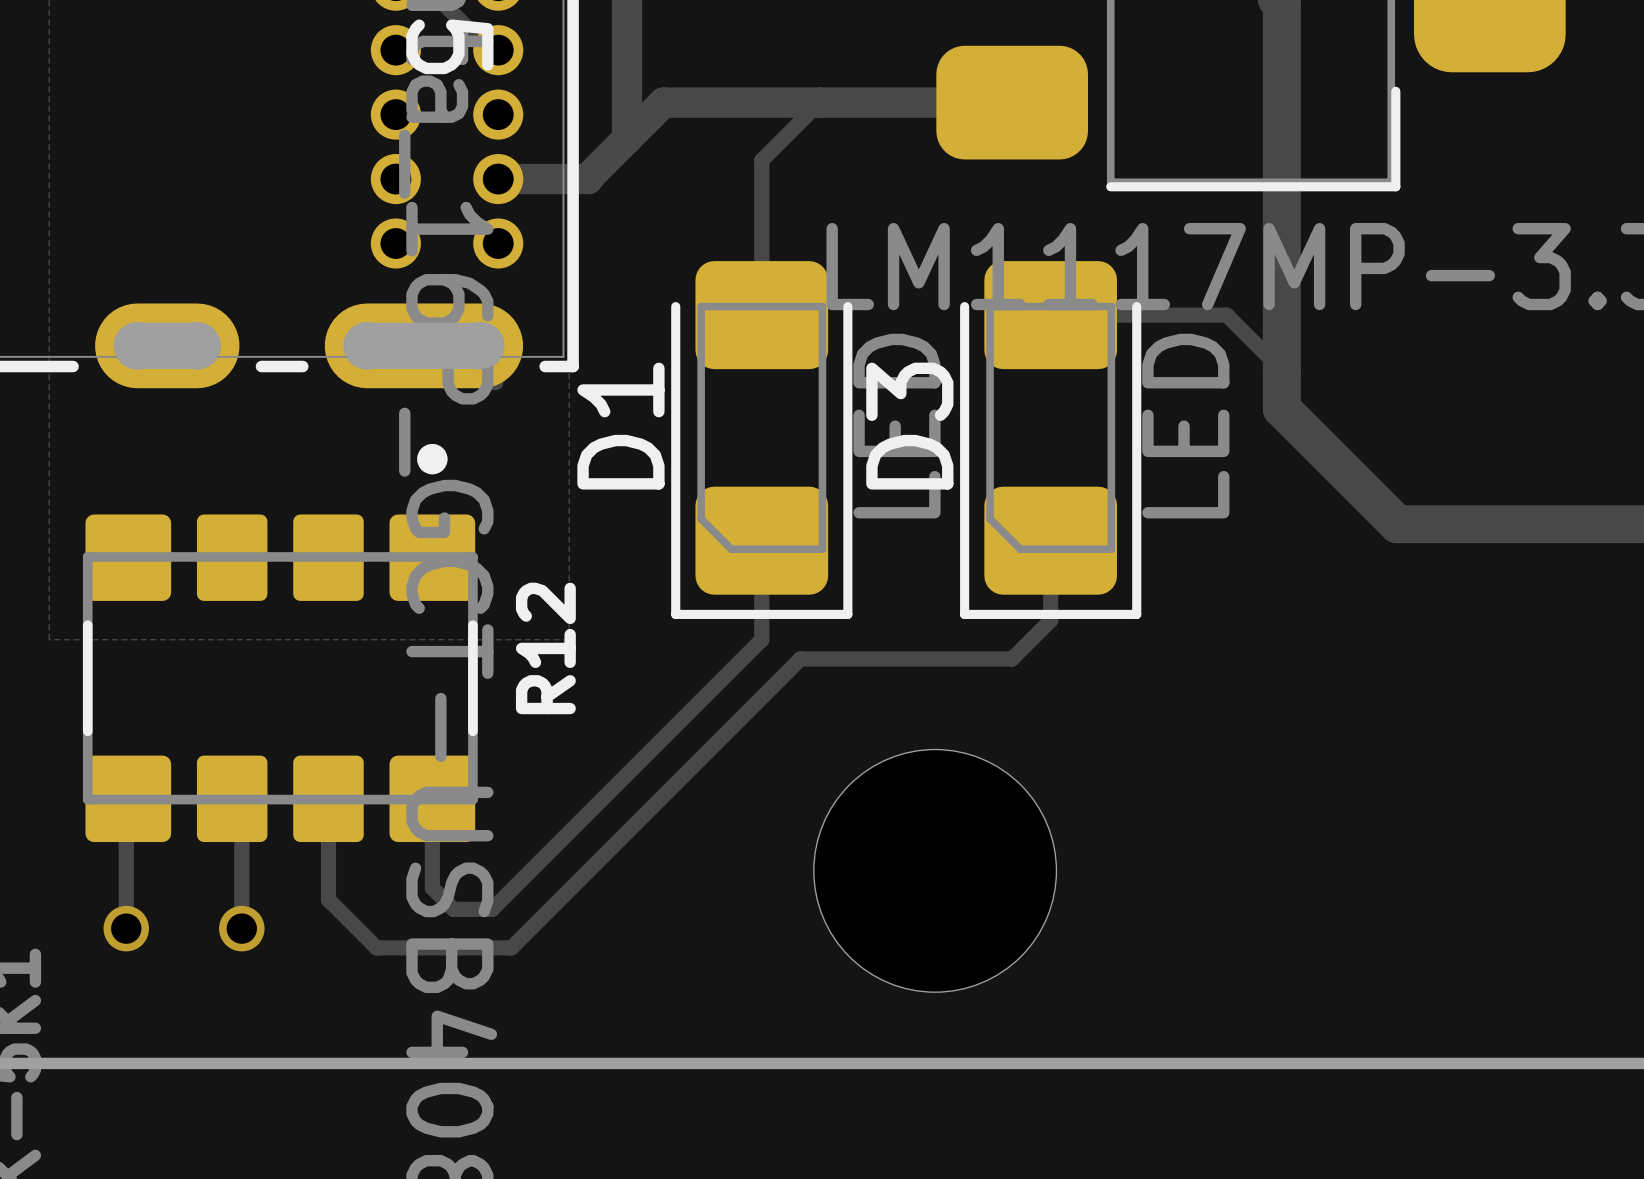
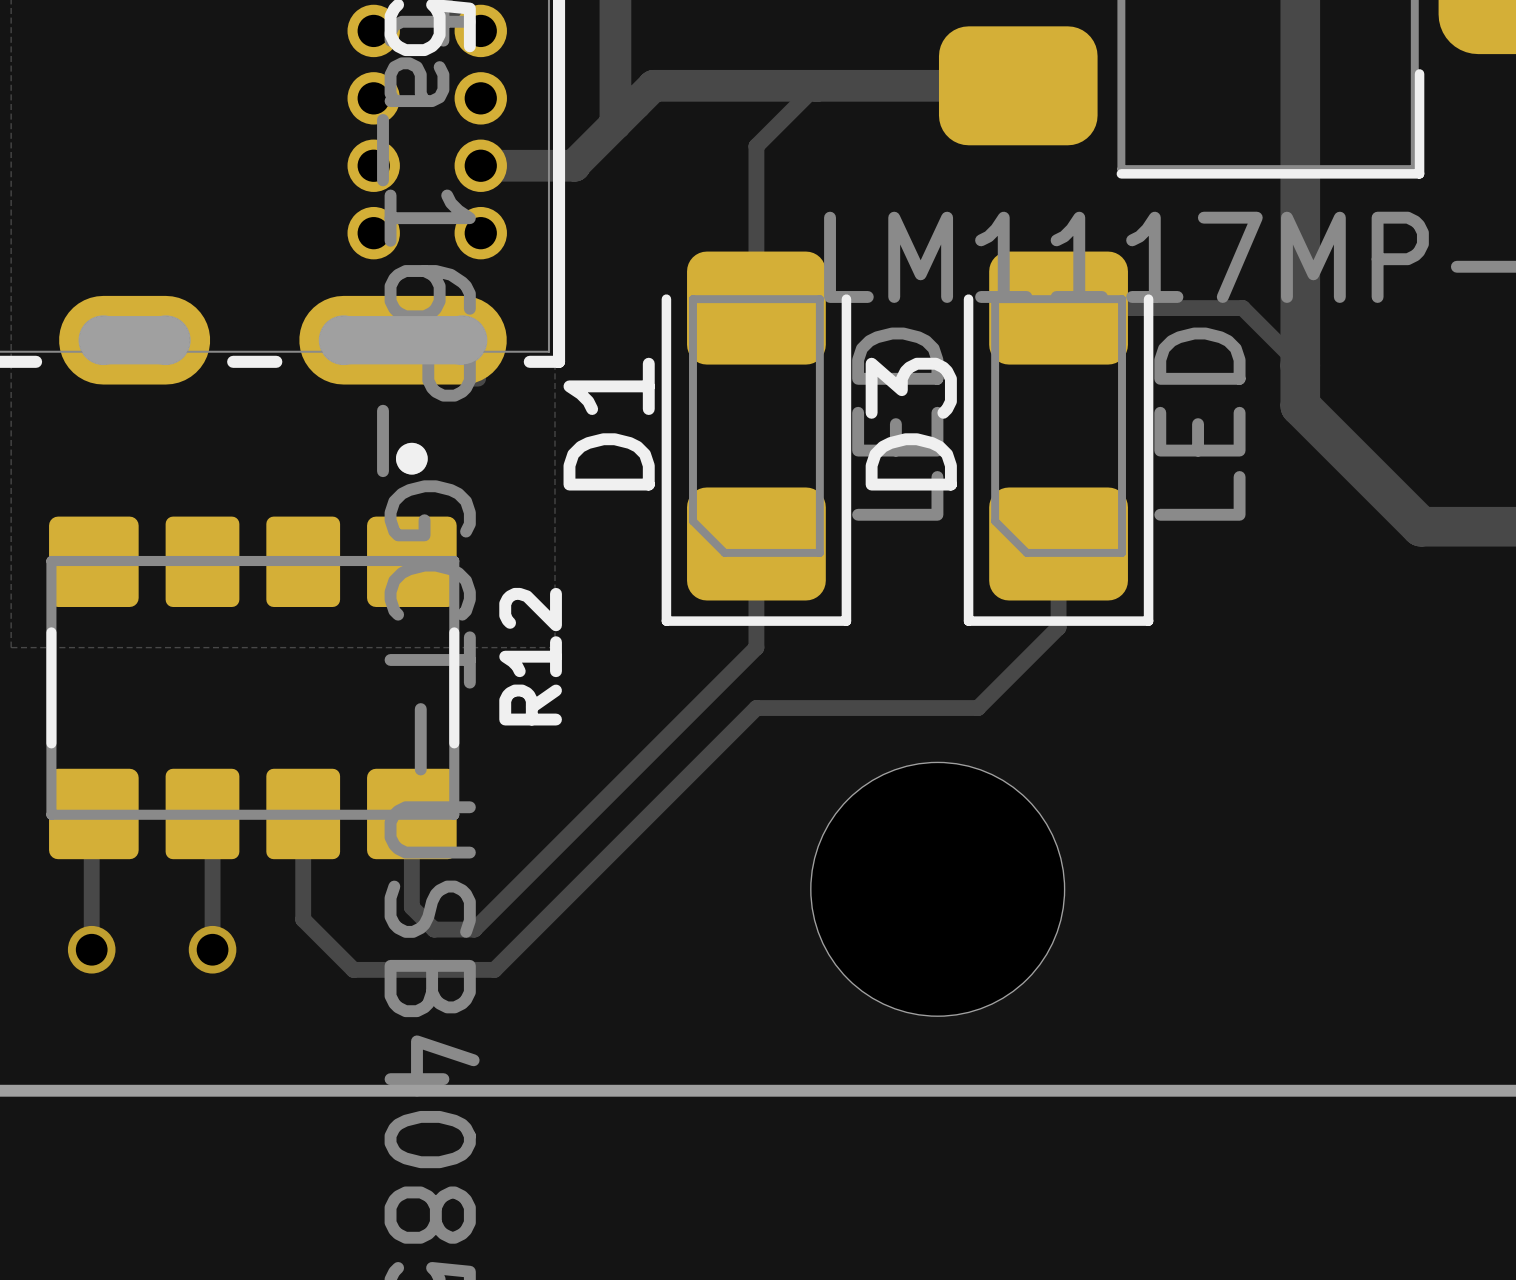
track: (1012, 659) (800, 659) (761, 697) -> (1018, 667) (977, 708) (756, 708)

